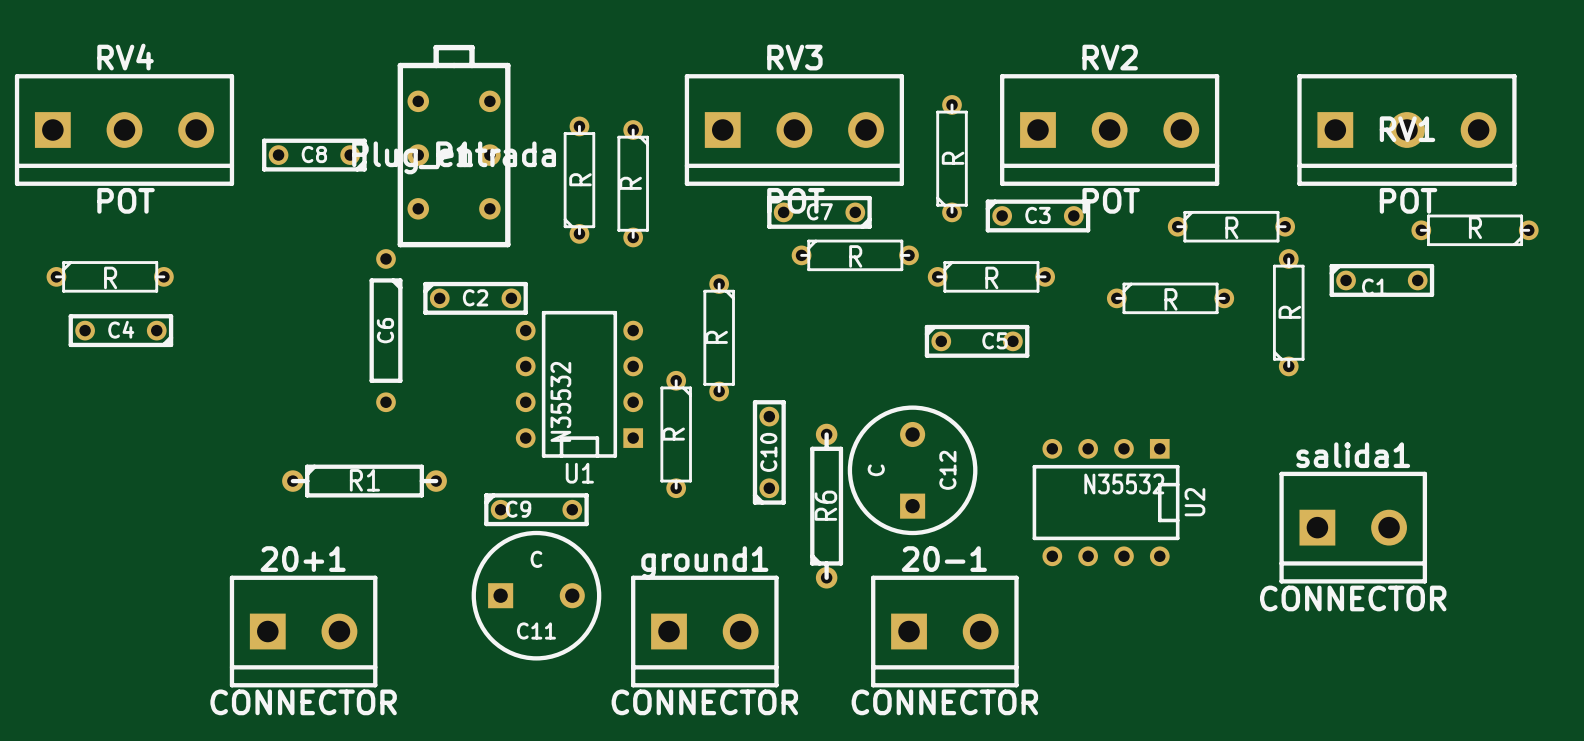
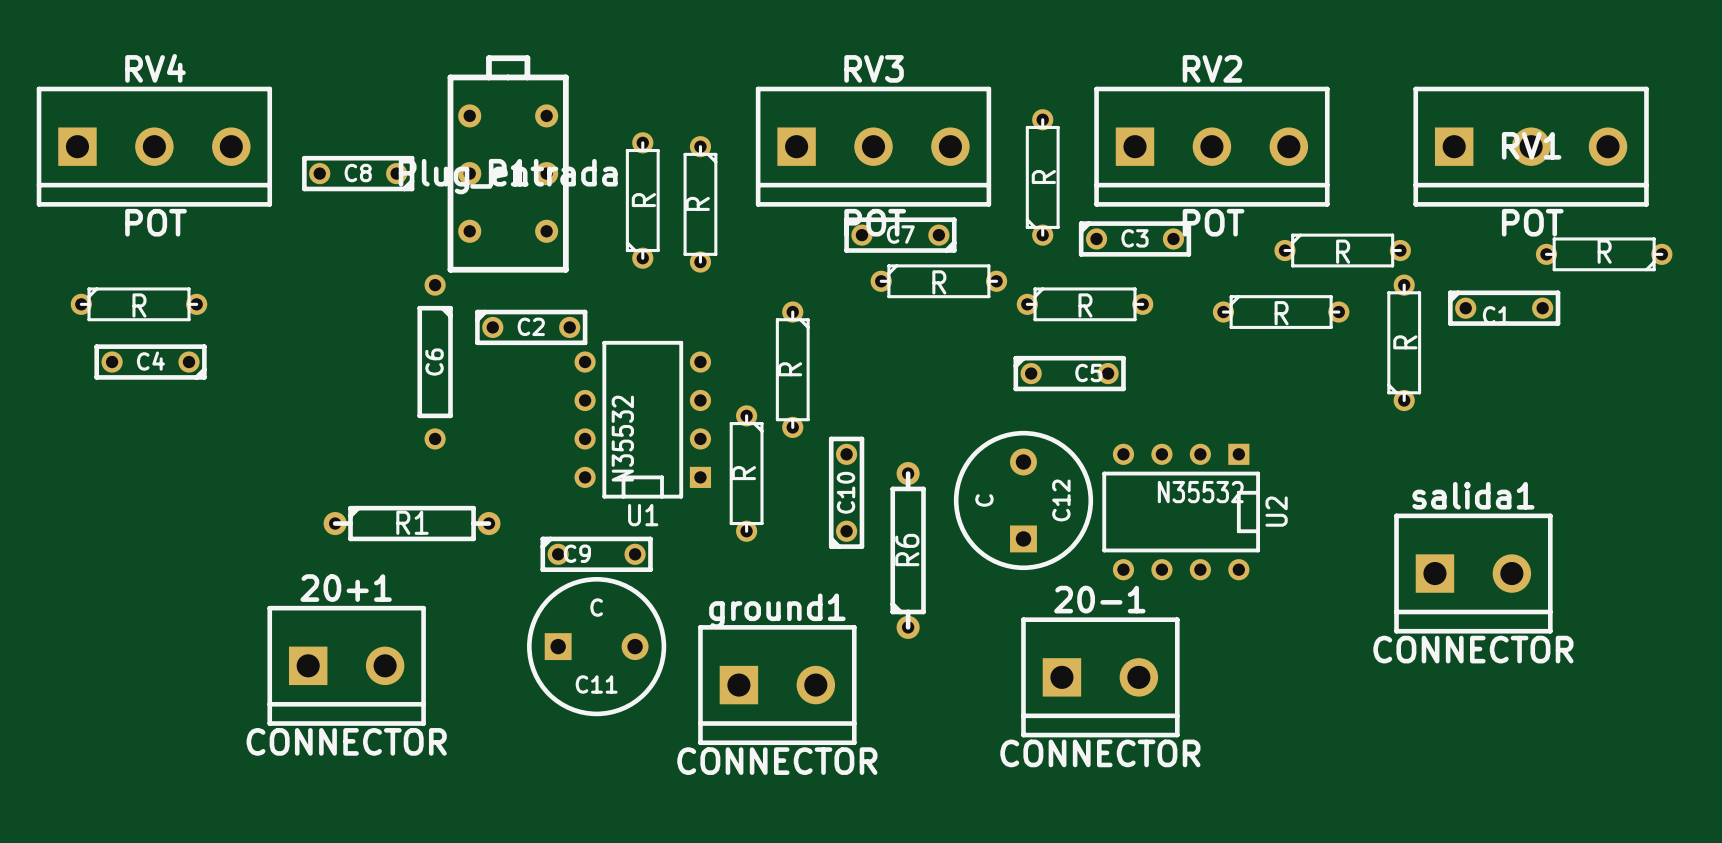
part position: (1170, 298) -> (1281, 312)
C12 position: (912, 470) -> (1023, 500)
U2 position: (1106, 502) -> (1181, 512)
20+1 position: (303, 631) -> (346, 665)
20-1 position: (944, 631) -> (1100, 677)

